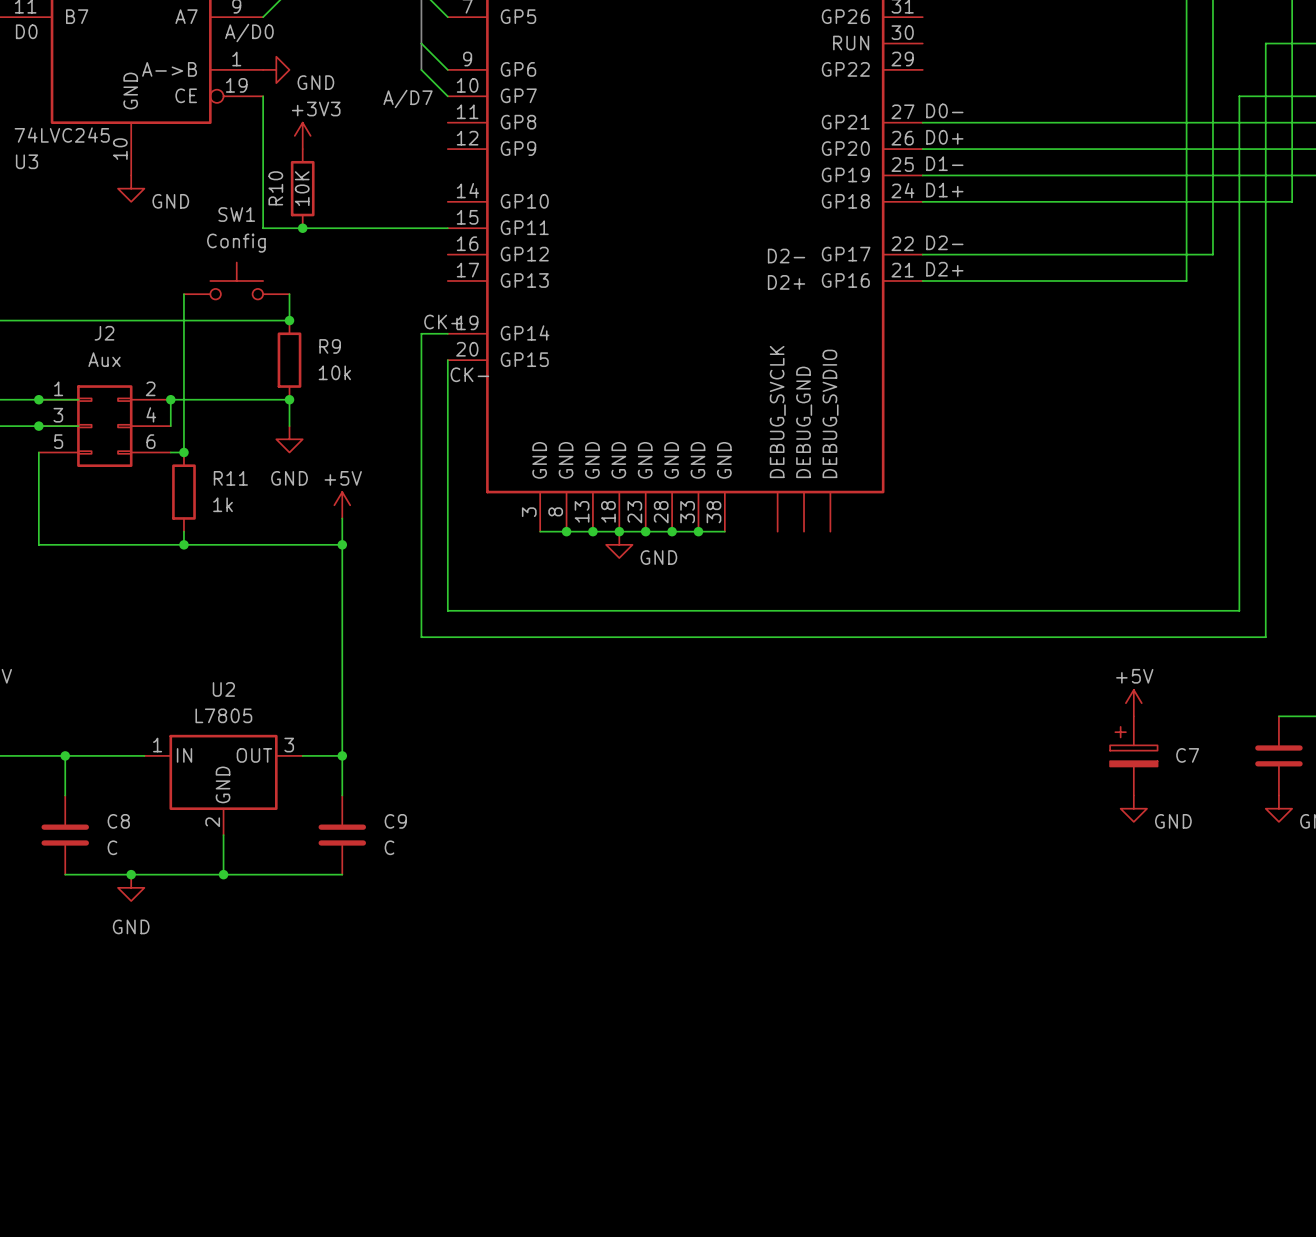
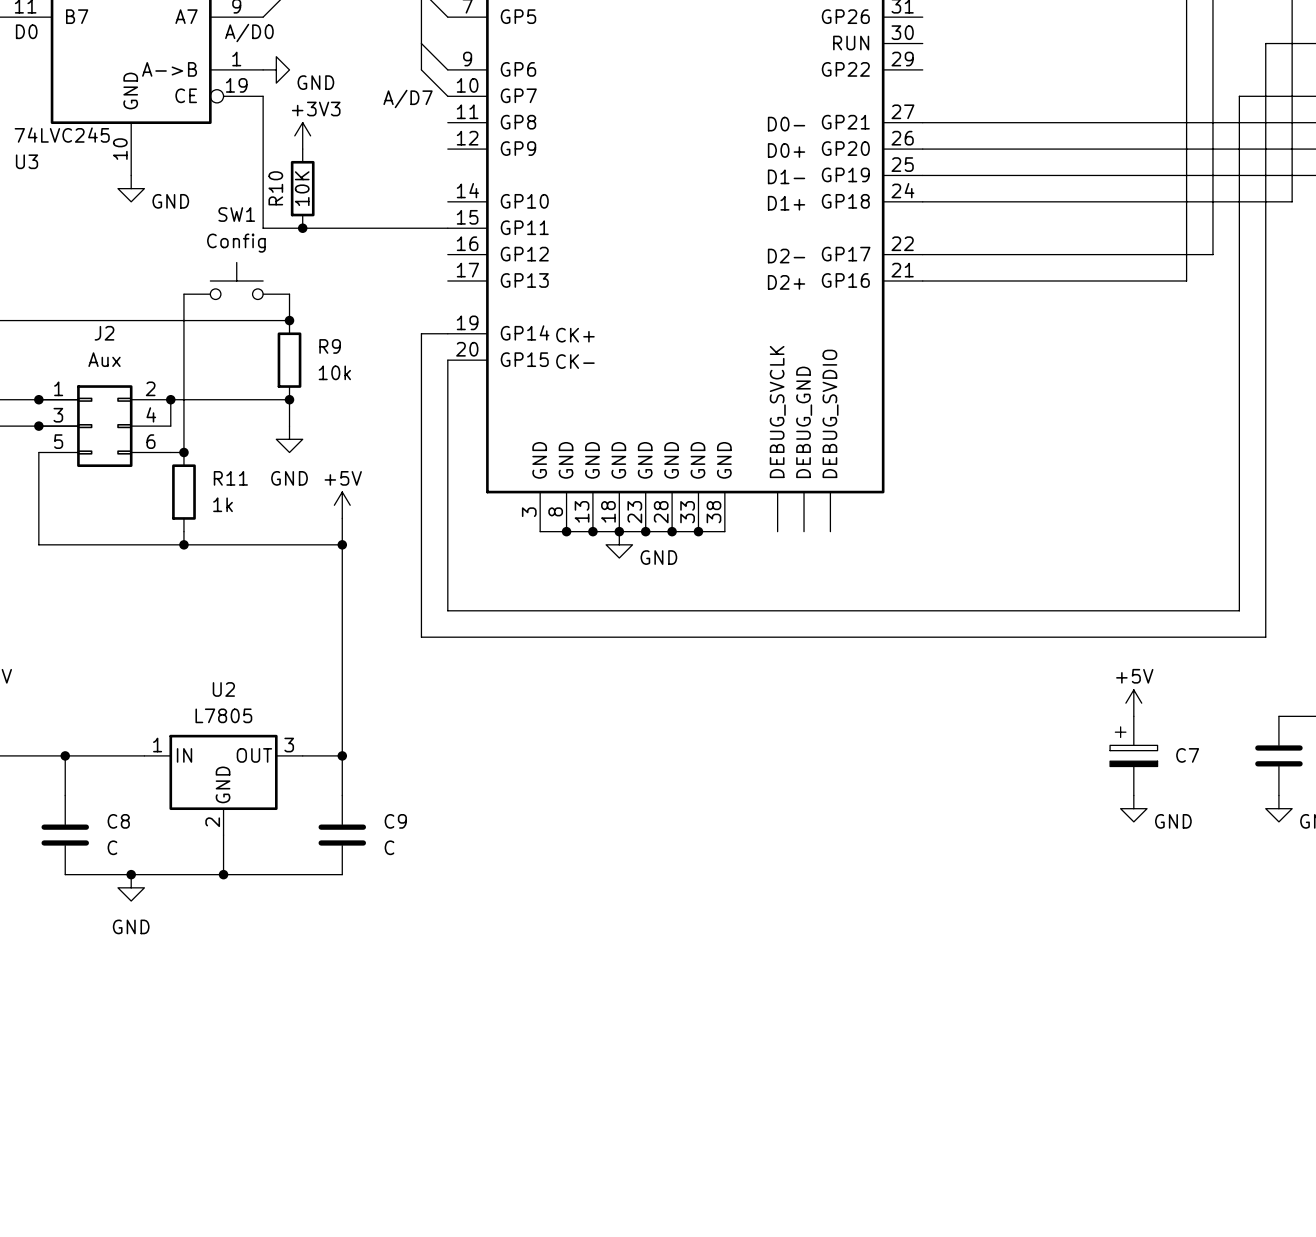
label position: D0- (944, 110) -> D0- (786, 124)
label position: D0+ (944, 137) -> D0+ (786, 150)
label position: D1- (944, 163) -> D1- (786, 176)
label position: D1+ (944, 190) -> D1+ (786, 203)
label: D2- (944, 242) -> none
label: D2+ (944, 269) -> none
label position: CK+ (443, 321) -> CK+ (575, 335)
label position: CK- (469, 374) -> CK- (575, 361)

